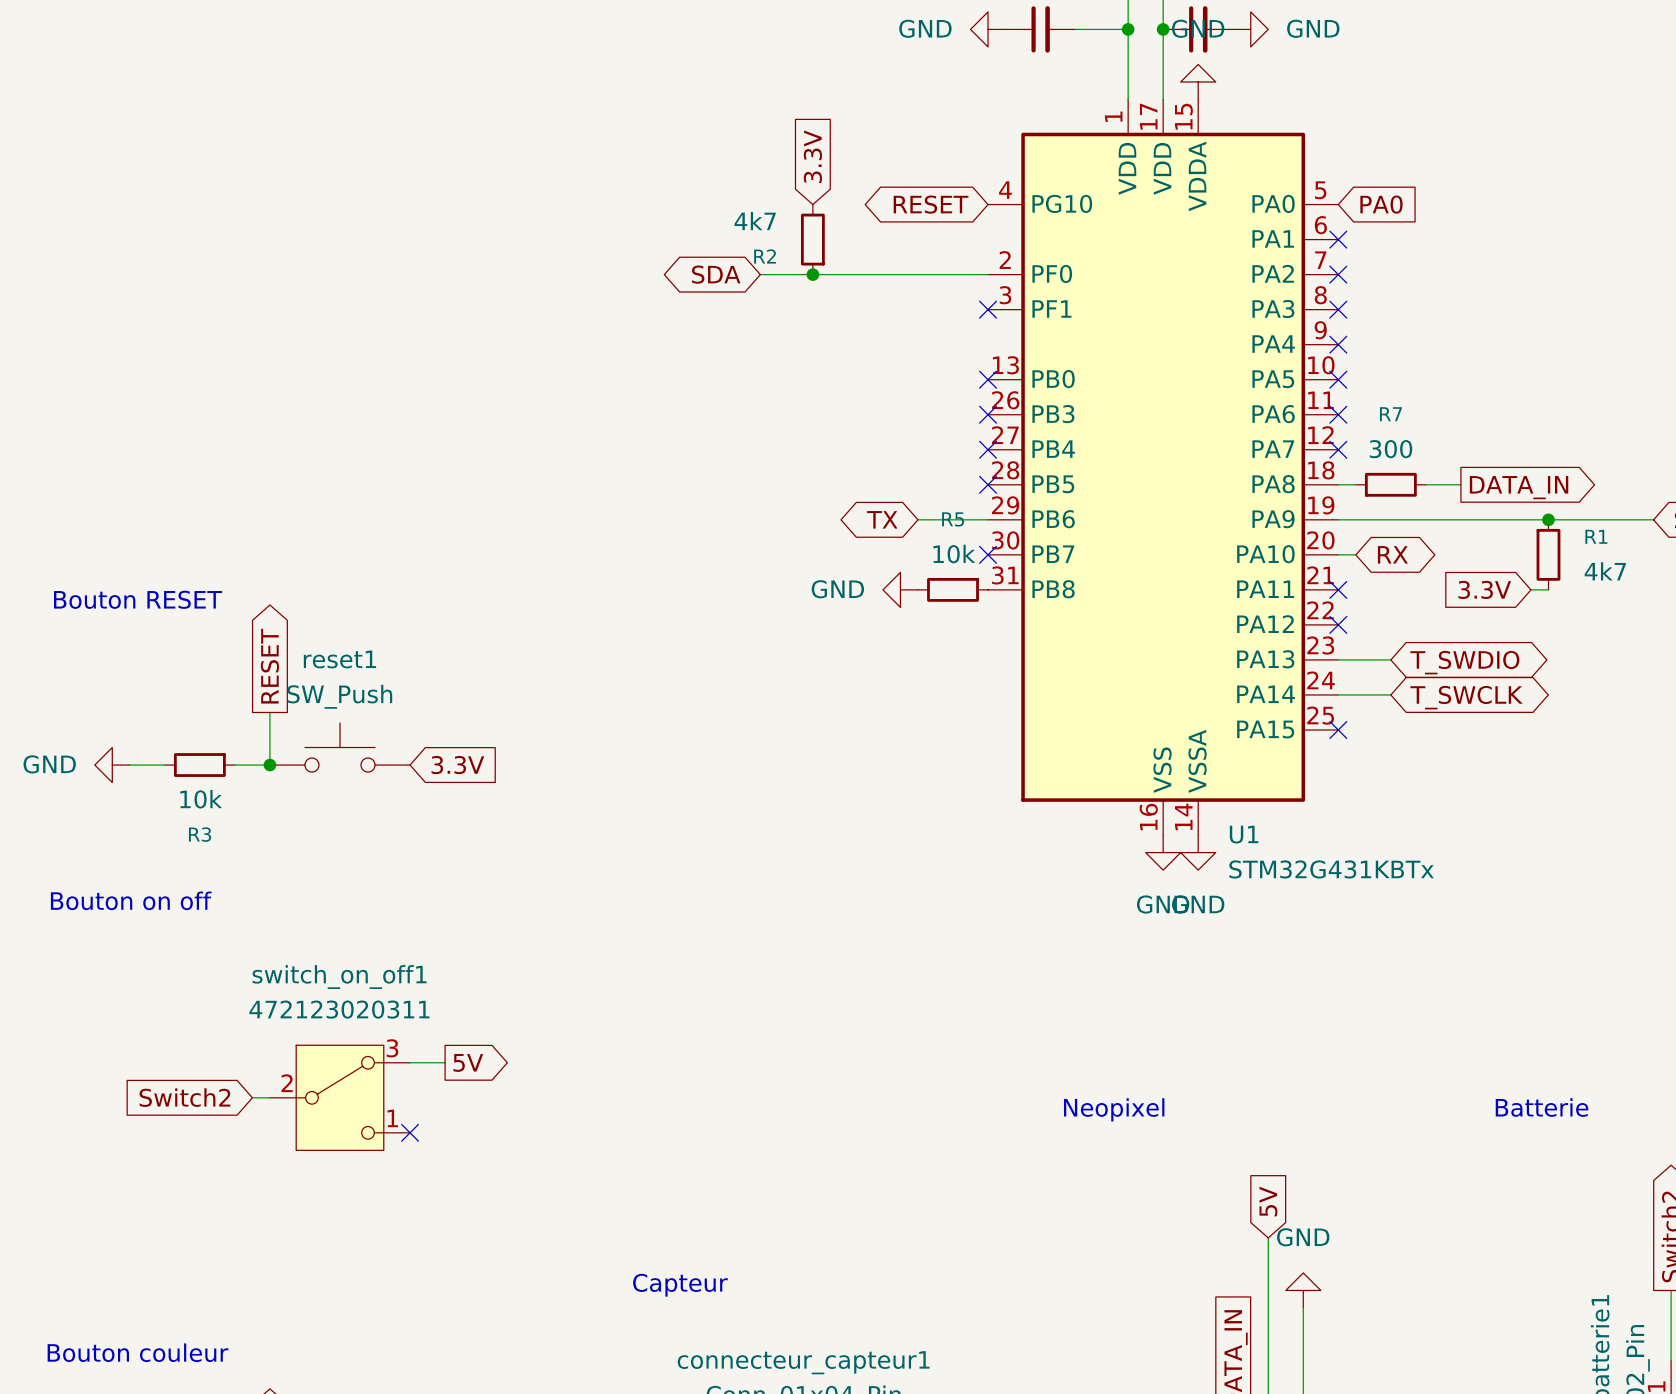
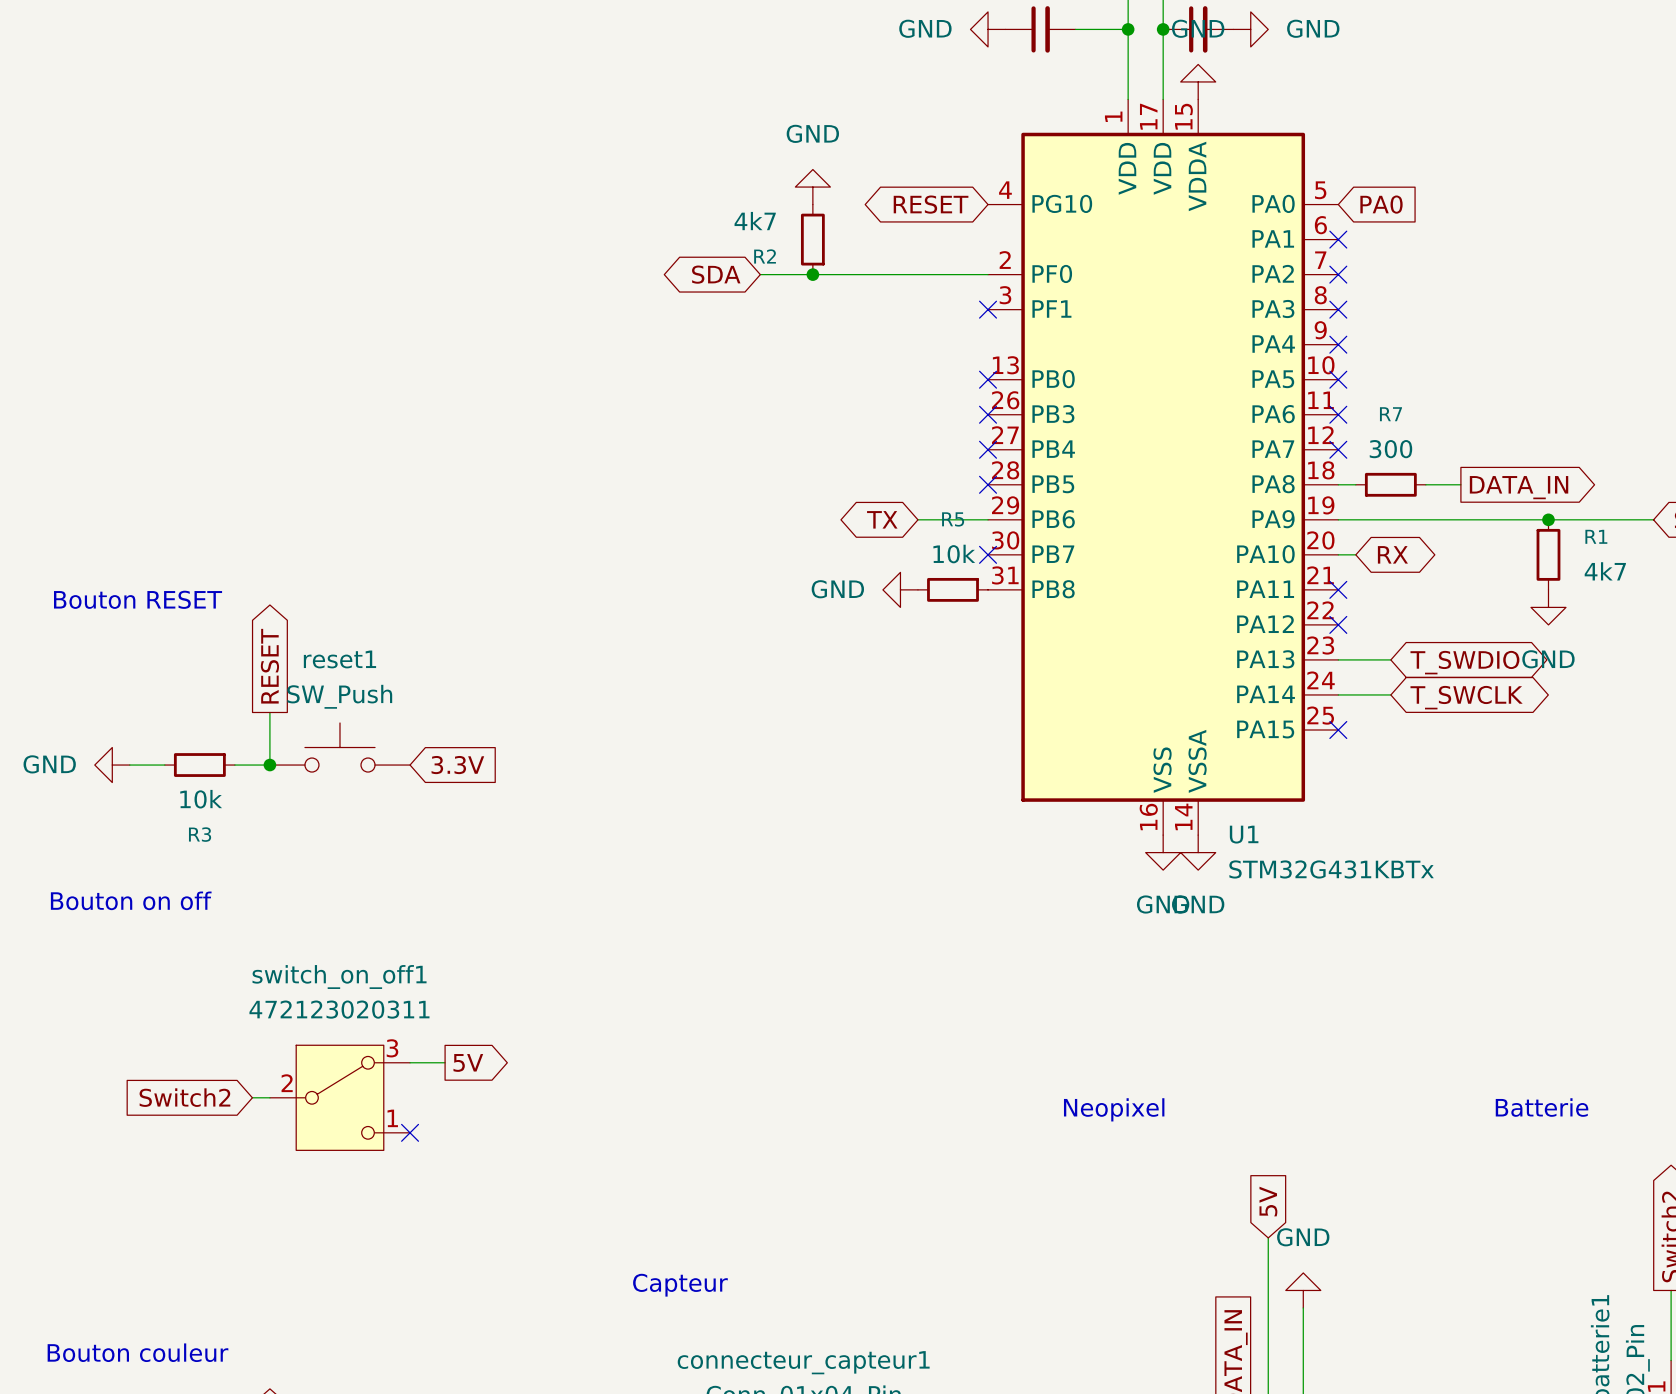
global label: 3.3V (812, 156) -> none
power symbol: none -> GND (812, 187)
global label: 3.3V (1484, 589) -> none
wire: (1530, 589) (1548, 589) -> none
power symbol: none -> GND (1548, 607)

